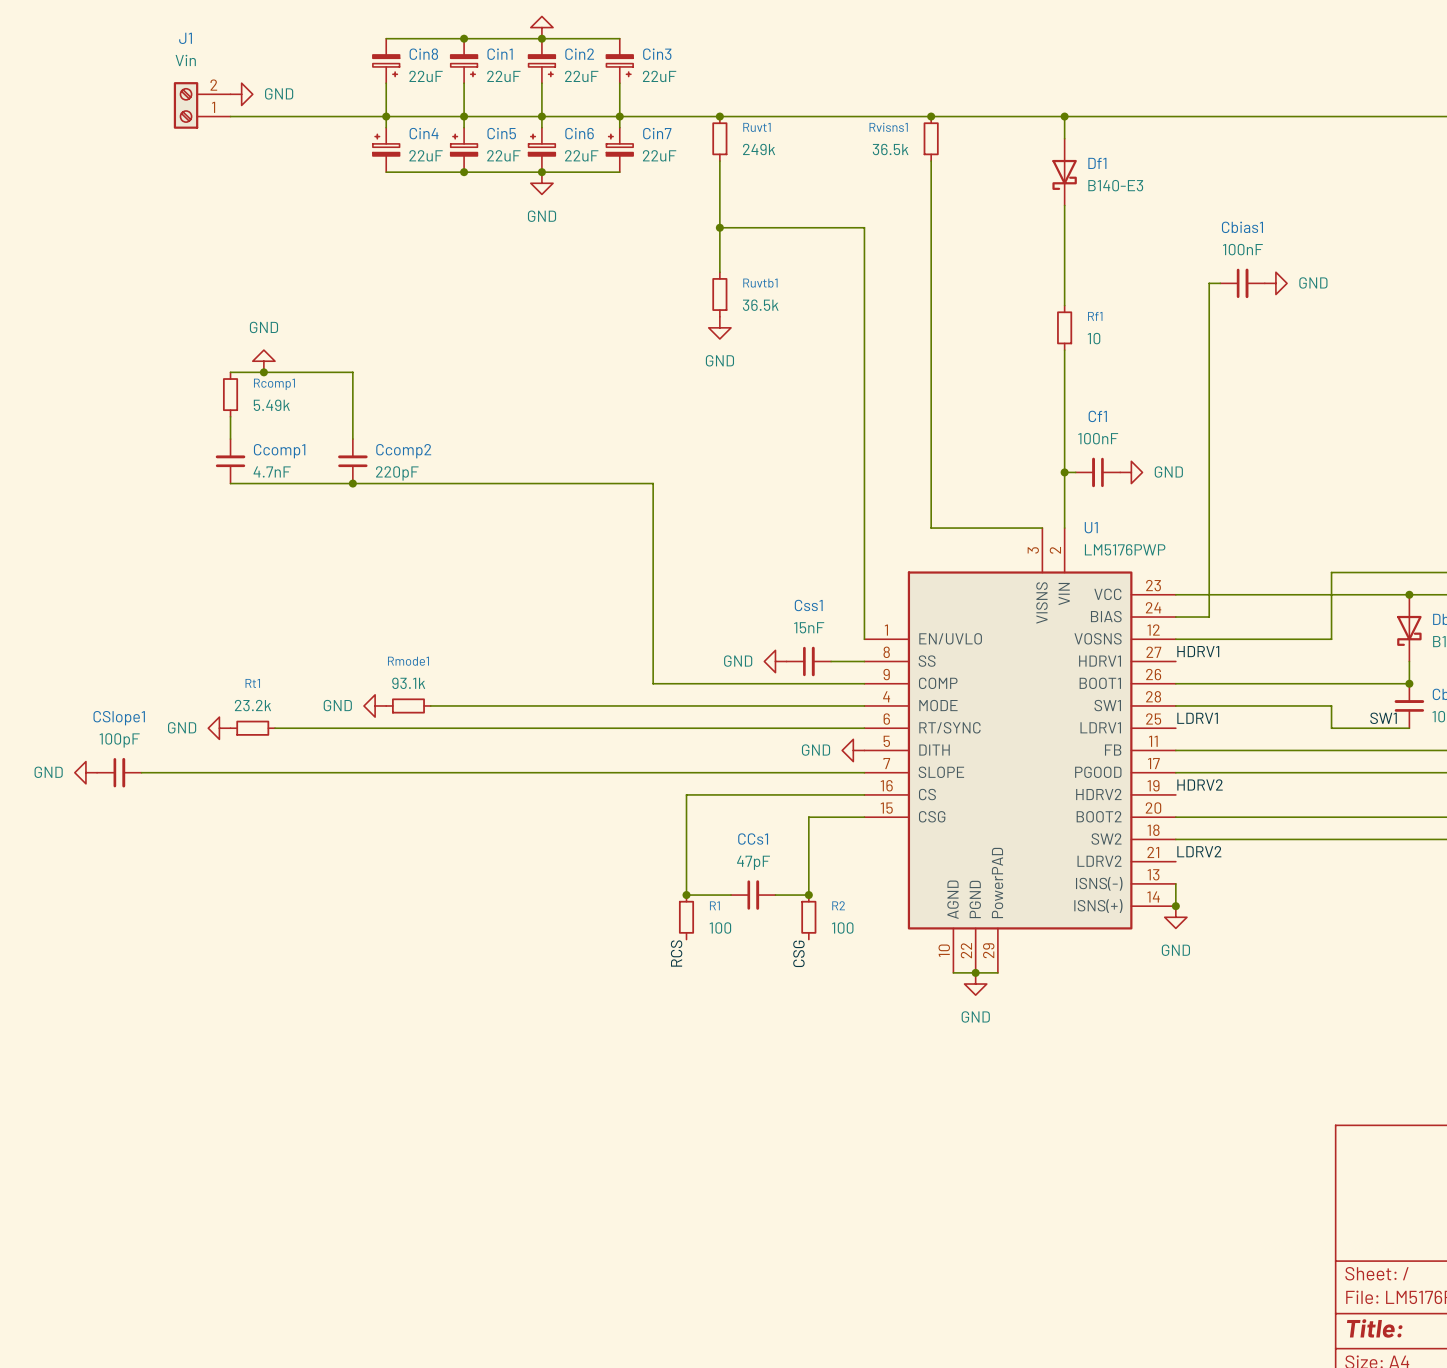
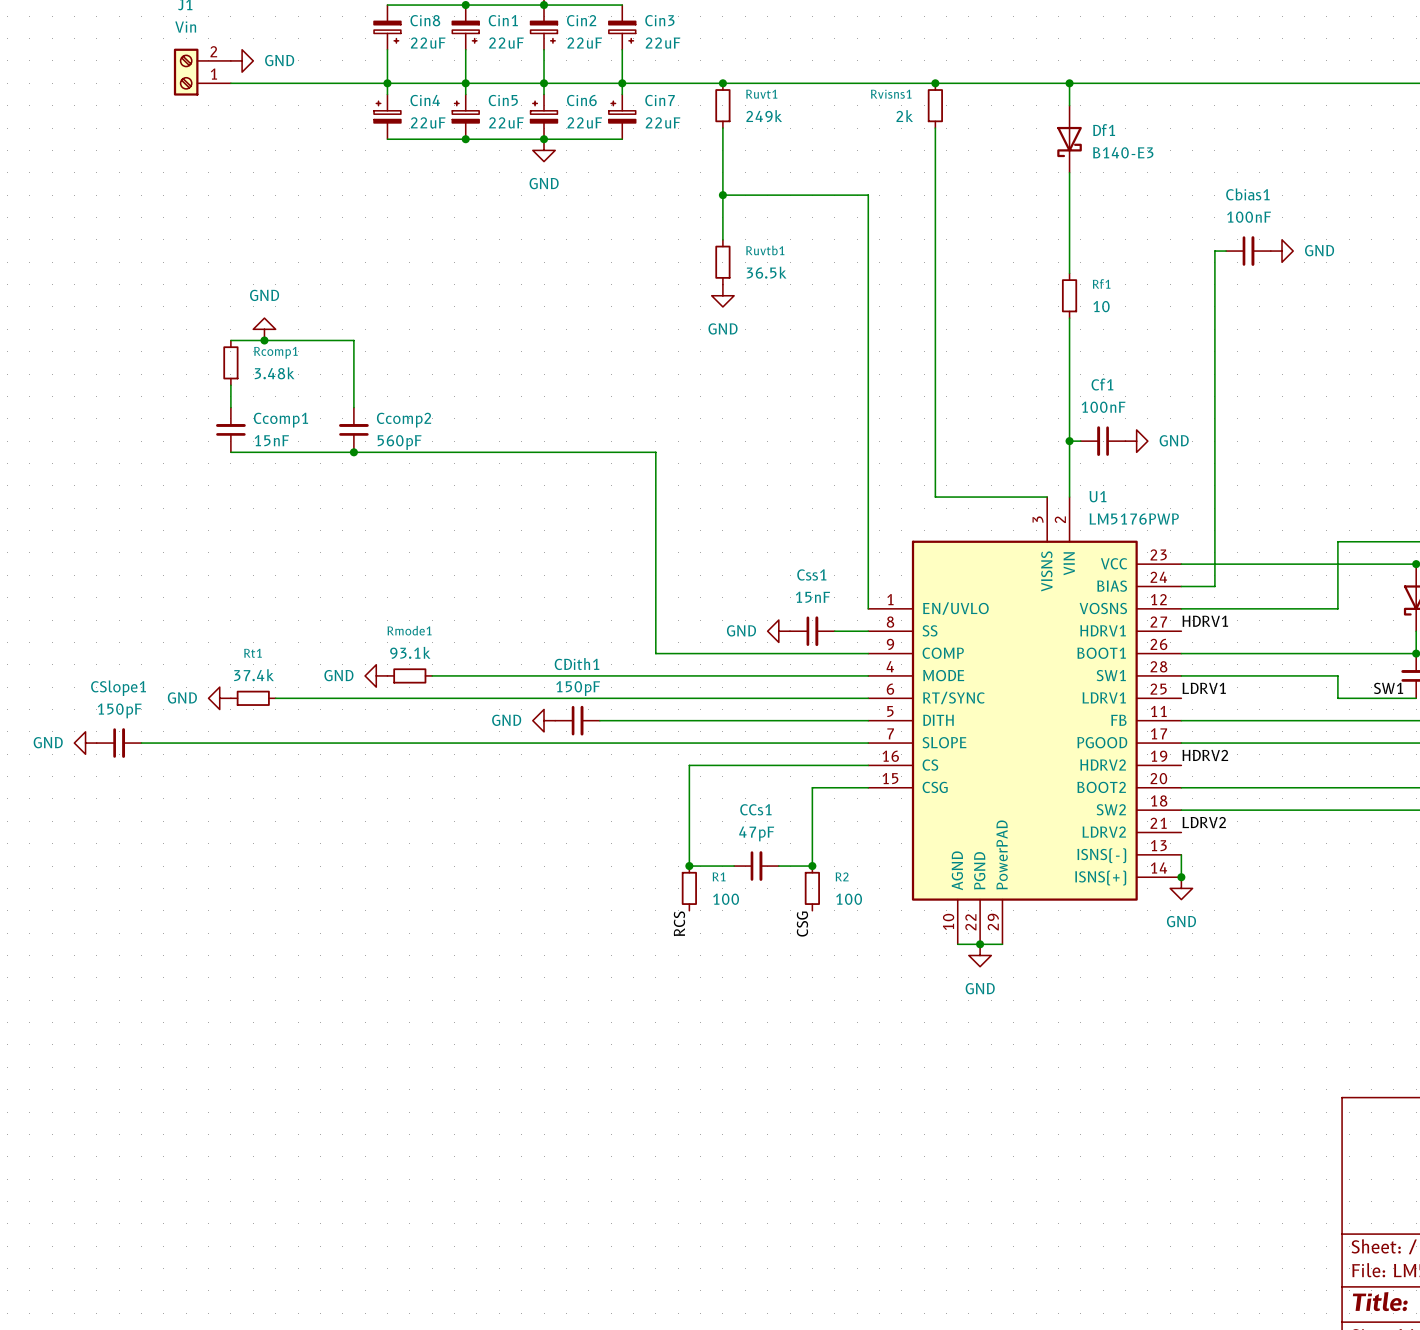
Rvisns1 value: 36.5k (890, 149) -> 2k (904, 116)
Rcomp1 value: 5.49k (271, 405) -> 3.48k (274, 373)
Ccomp1 value: 4.7nF (272, 471) -> 15nF (271, 440)
Ccomp2 value: 220pF (397, 473) -> 560pF (399, 442)
Rt1 value: 23.2k (252, 705) -> 37.4k (254, 675)
CSlope1 value: 100pF (119, 740) -> 150pF (119, 710)
power symbol: none -> GND (544, 720)
CDith1: none -> 150pF (577, 720)
wire: none -> (599, 720) (868, 720)
power symbol: GND (853, 750) -> none

